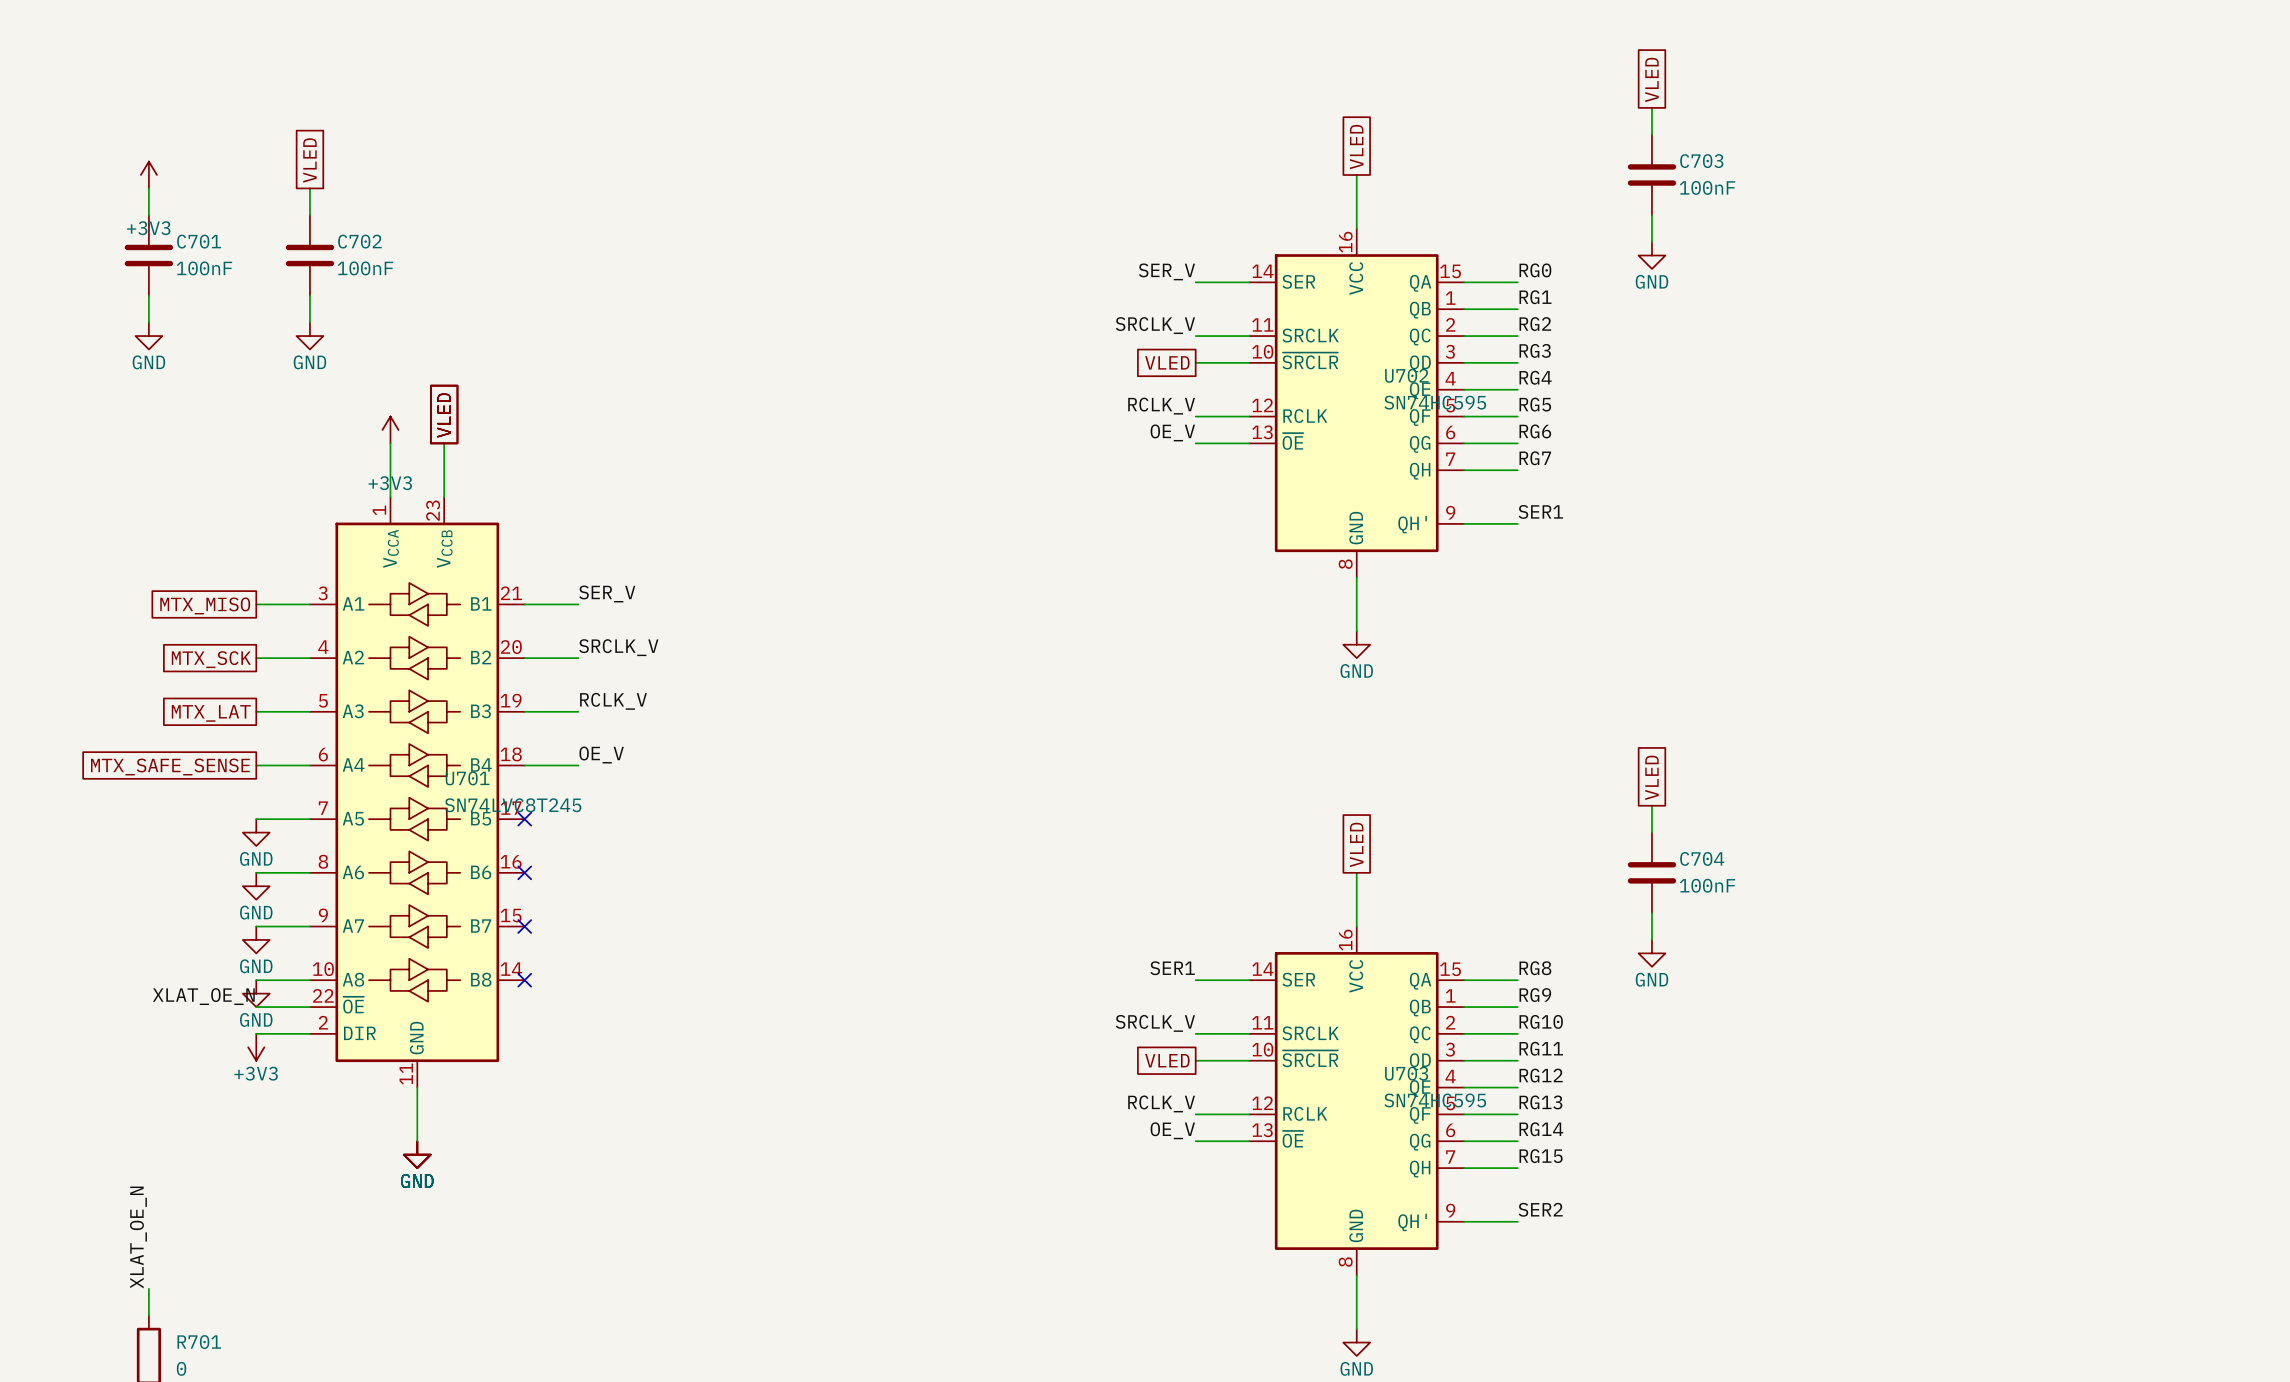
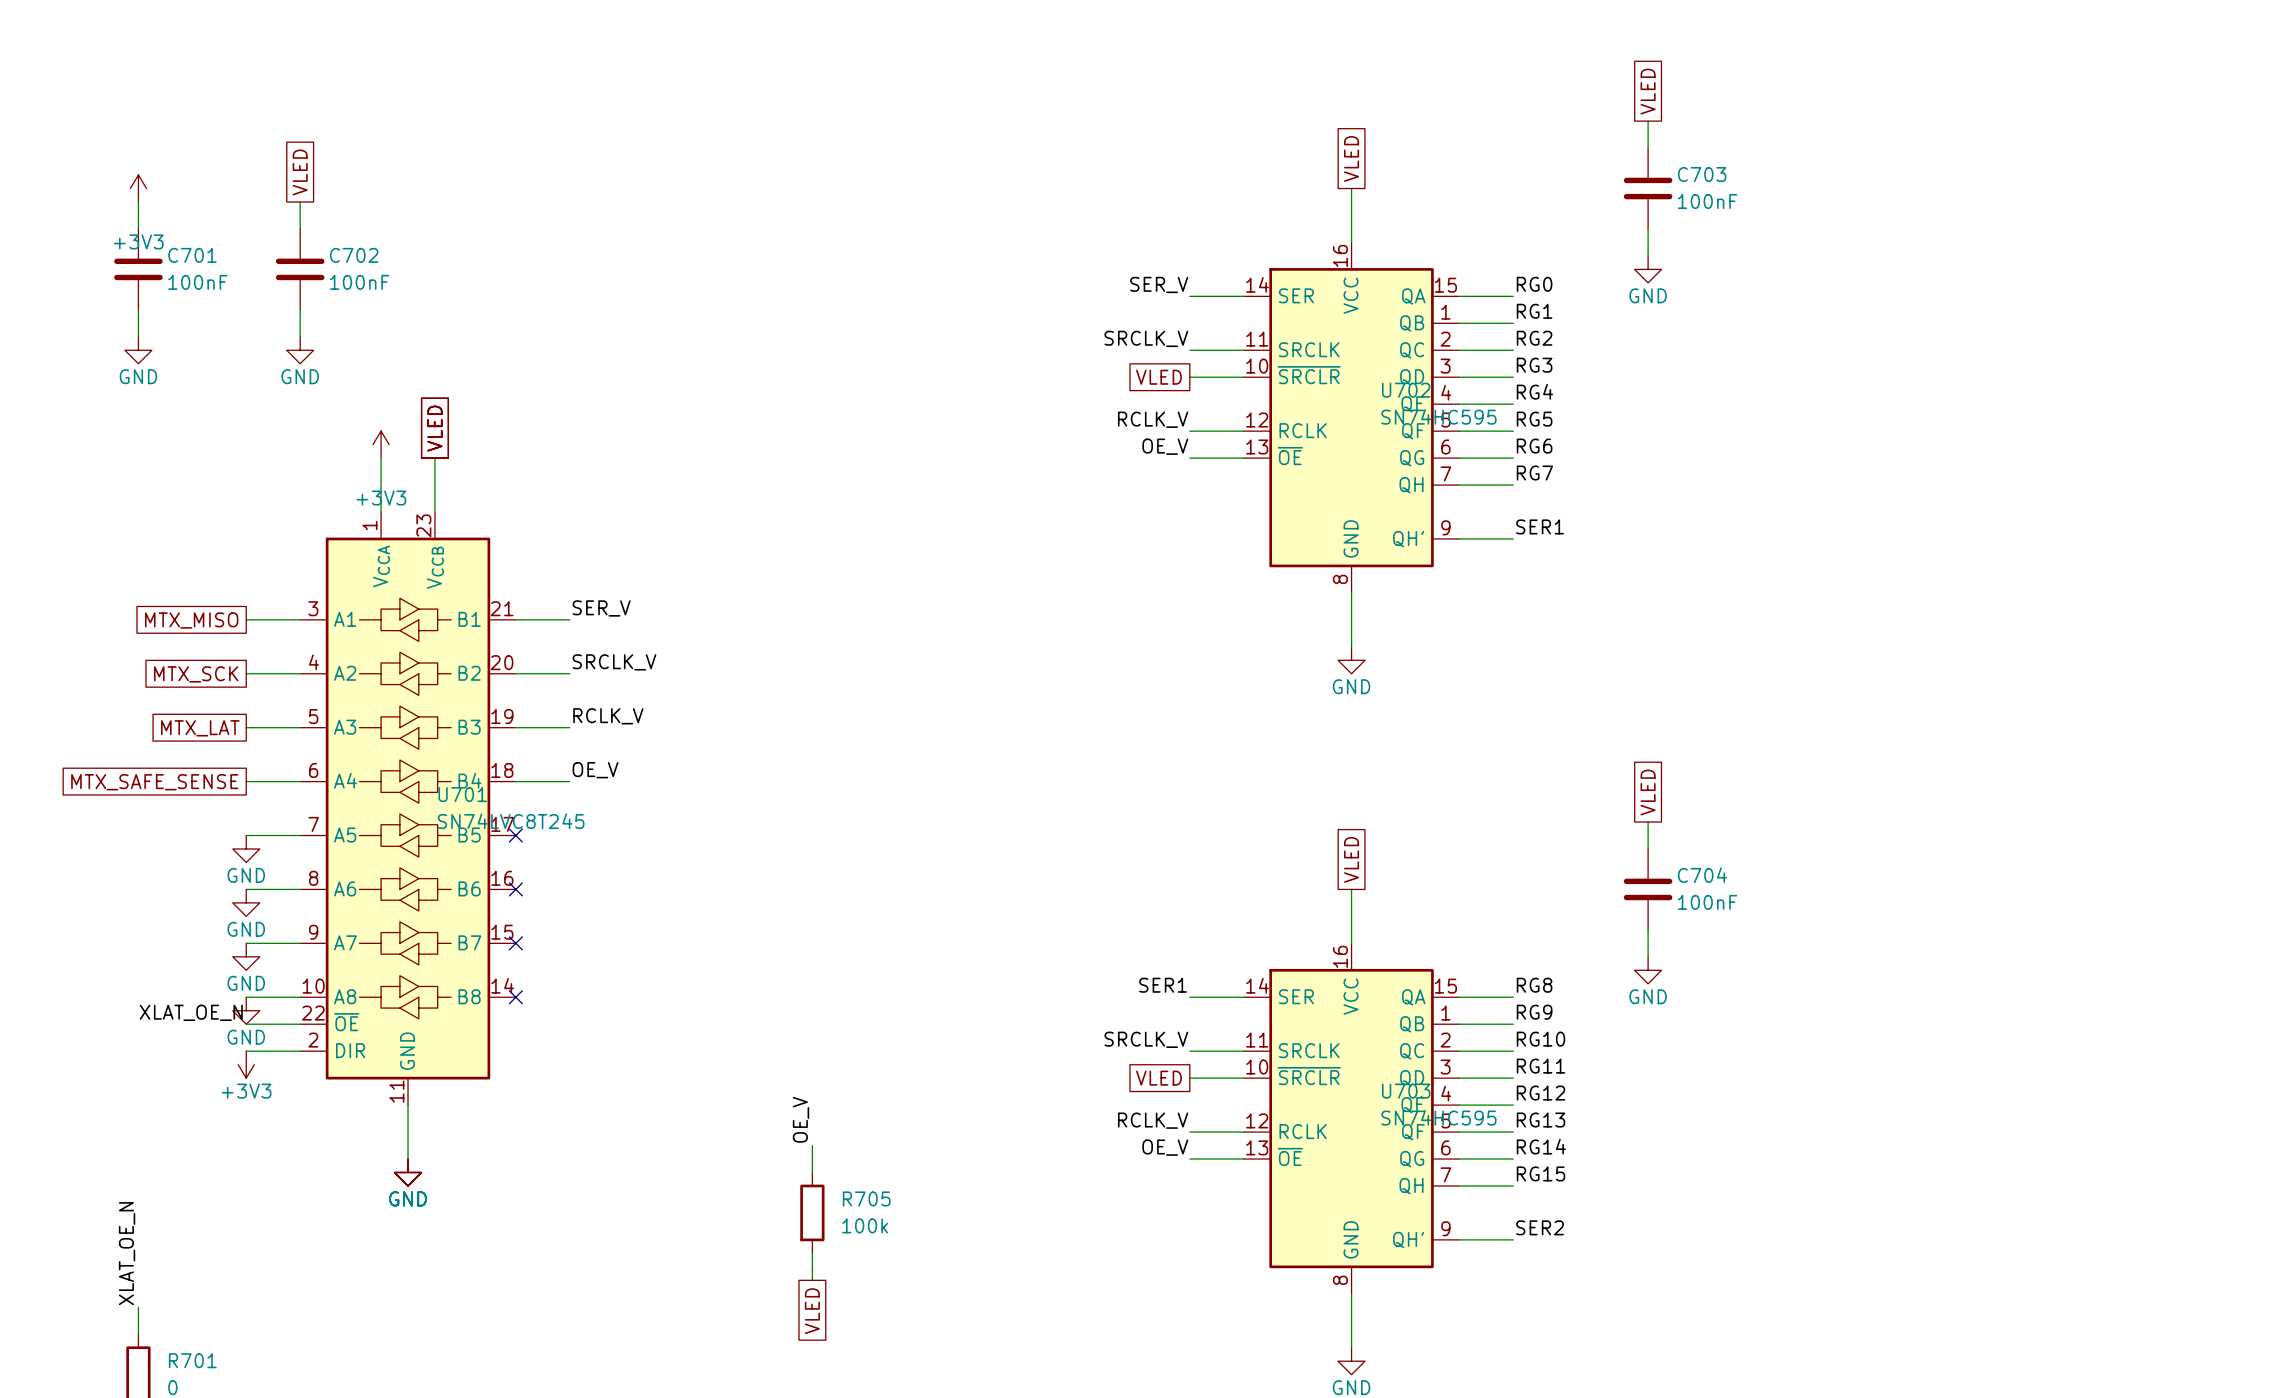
label: none -> OE_V (800, 1119)
wire: none -> (812, 1145) (812, 1172)
R705: none -> 100k (812, 1212)
wire: none -> (812, 1253) (812, 1280)
global label: none -> VLED (812, 1311)

